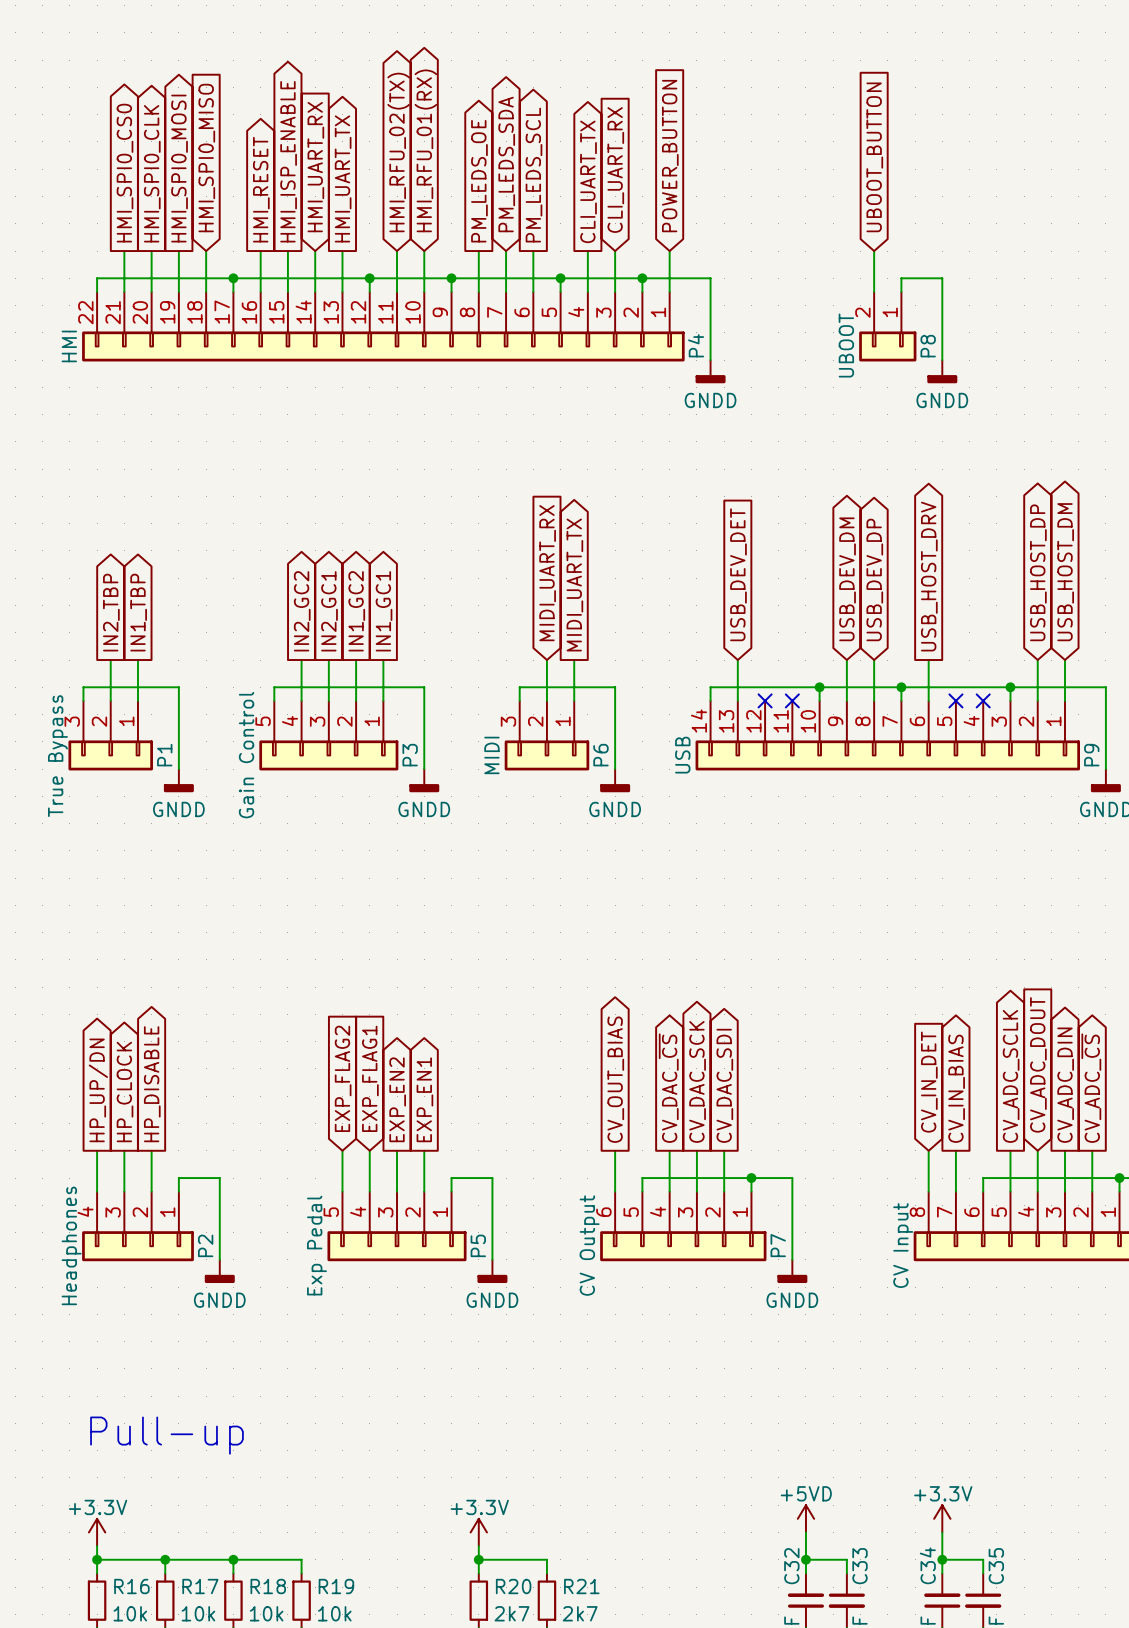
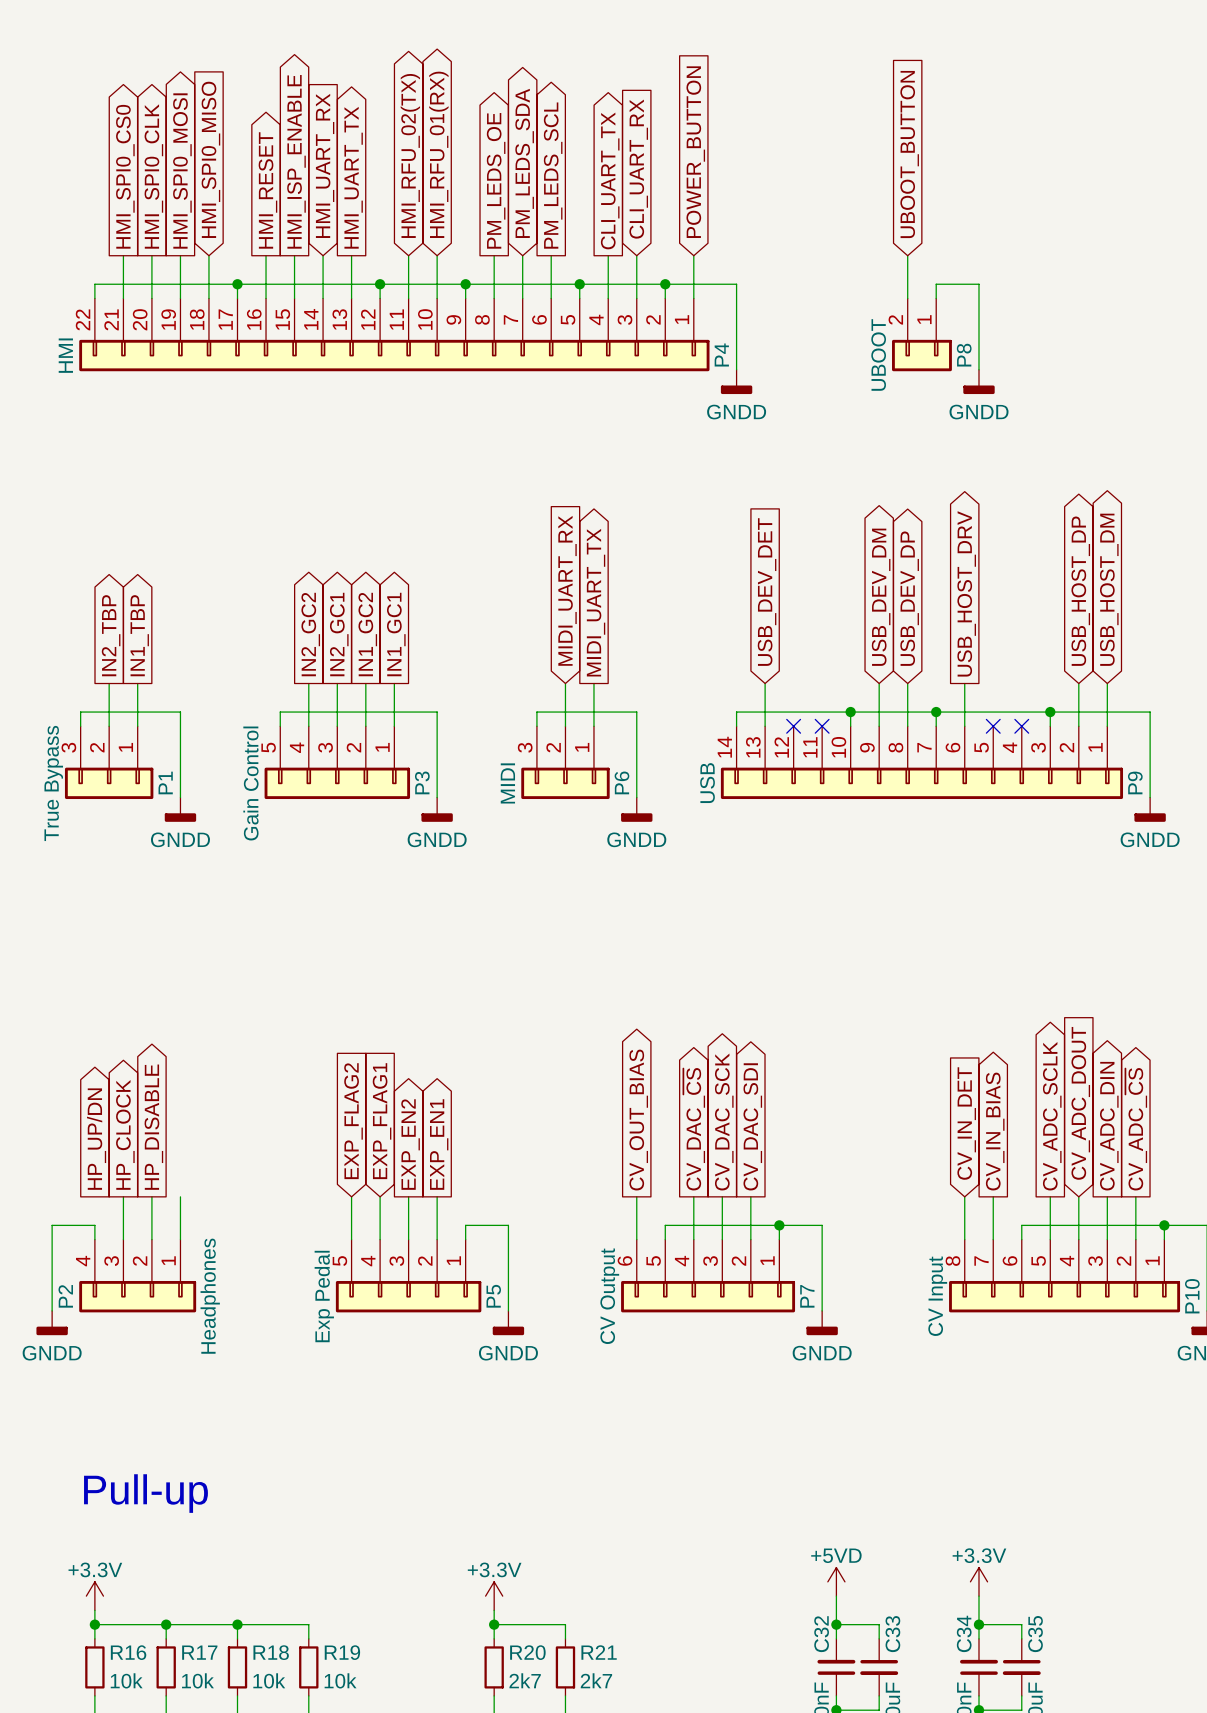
wire: (97, 1150) (97, 1178) -> (52, 1310) (52, 1225) (94, 1225)
wire: (178, 1178) (219, 1178) (219, 1259) -> (180, 1225) (180, 1196)
P2 value position: Headphones (71, 1245) -> Headphones (210, 1296)
P2 name position: P2 (205, 1245) -> P2 (65, 1296)
power symbol position: GNDD (219, 1271) -> GNDD (52, 1323)

